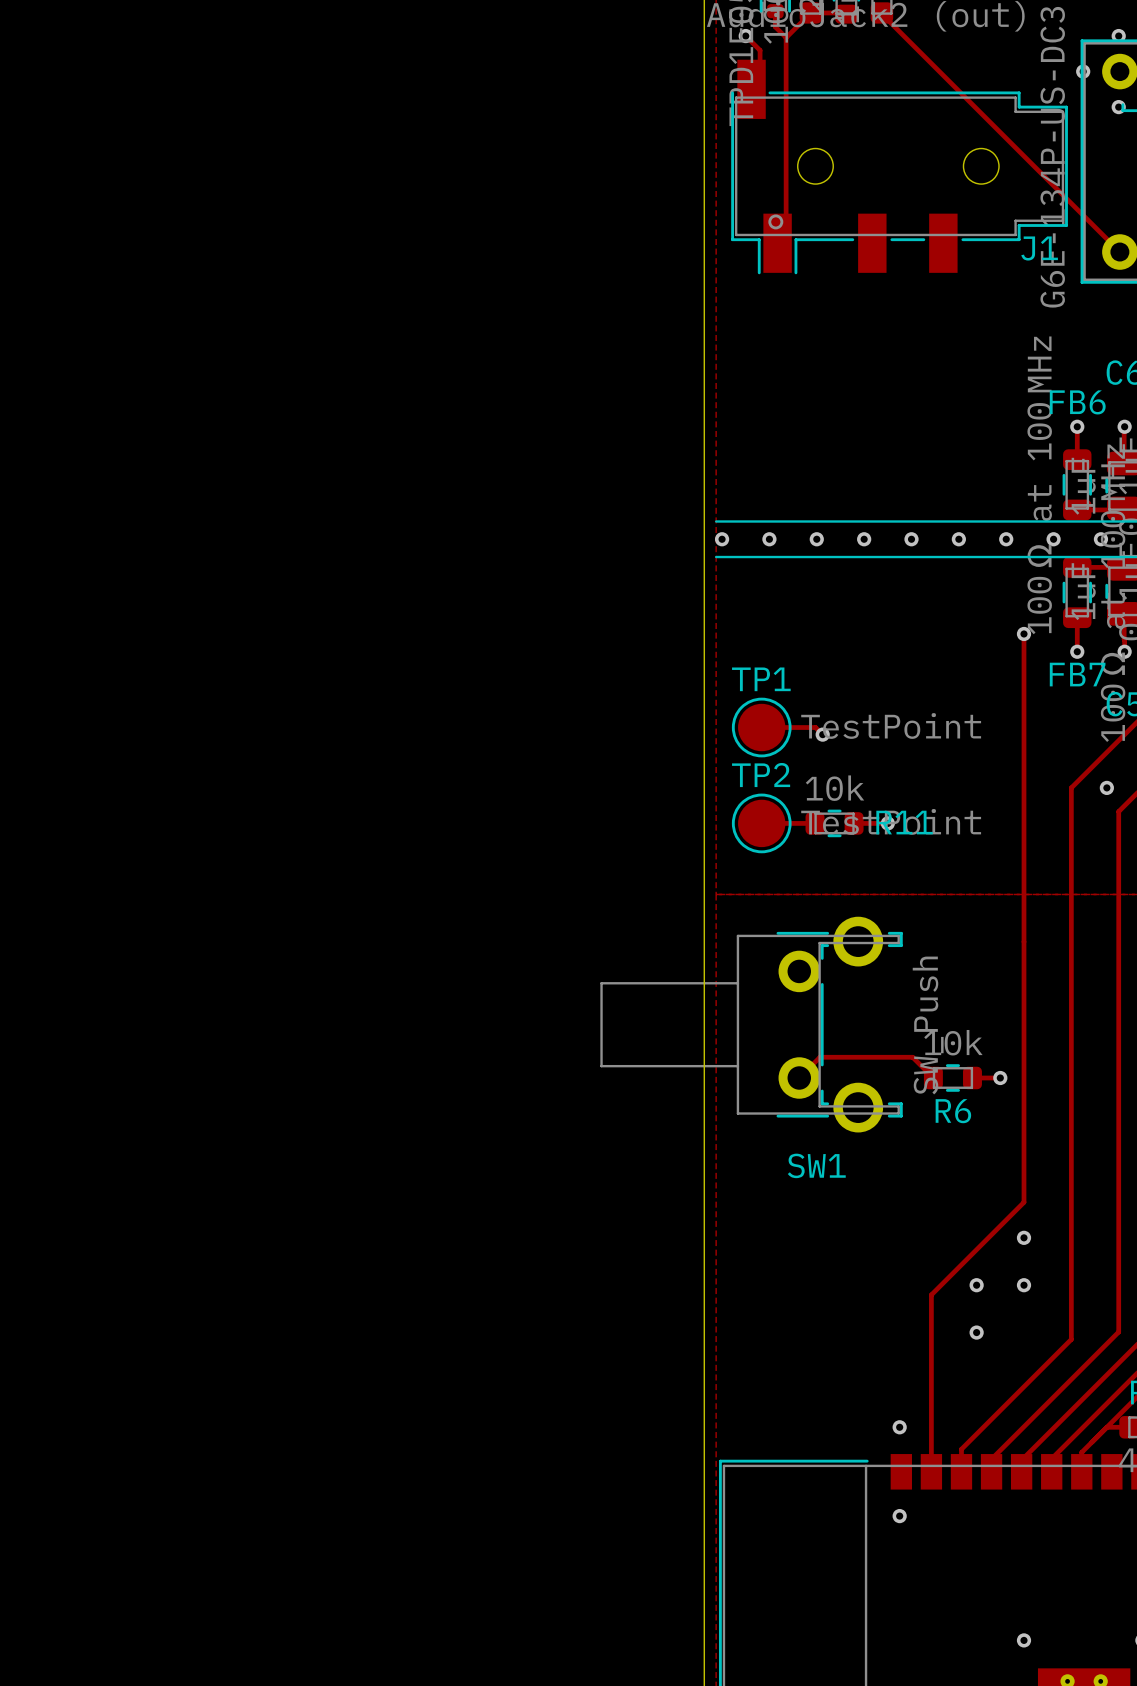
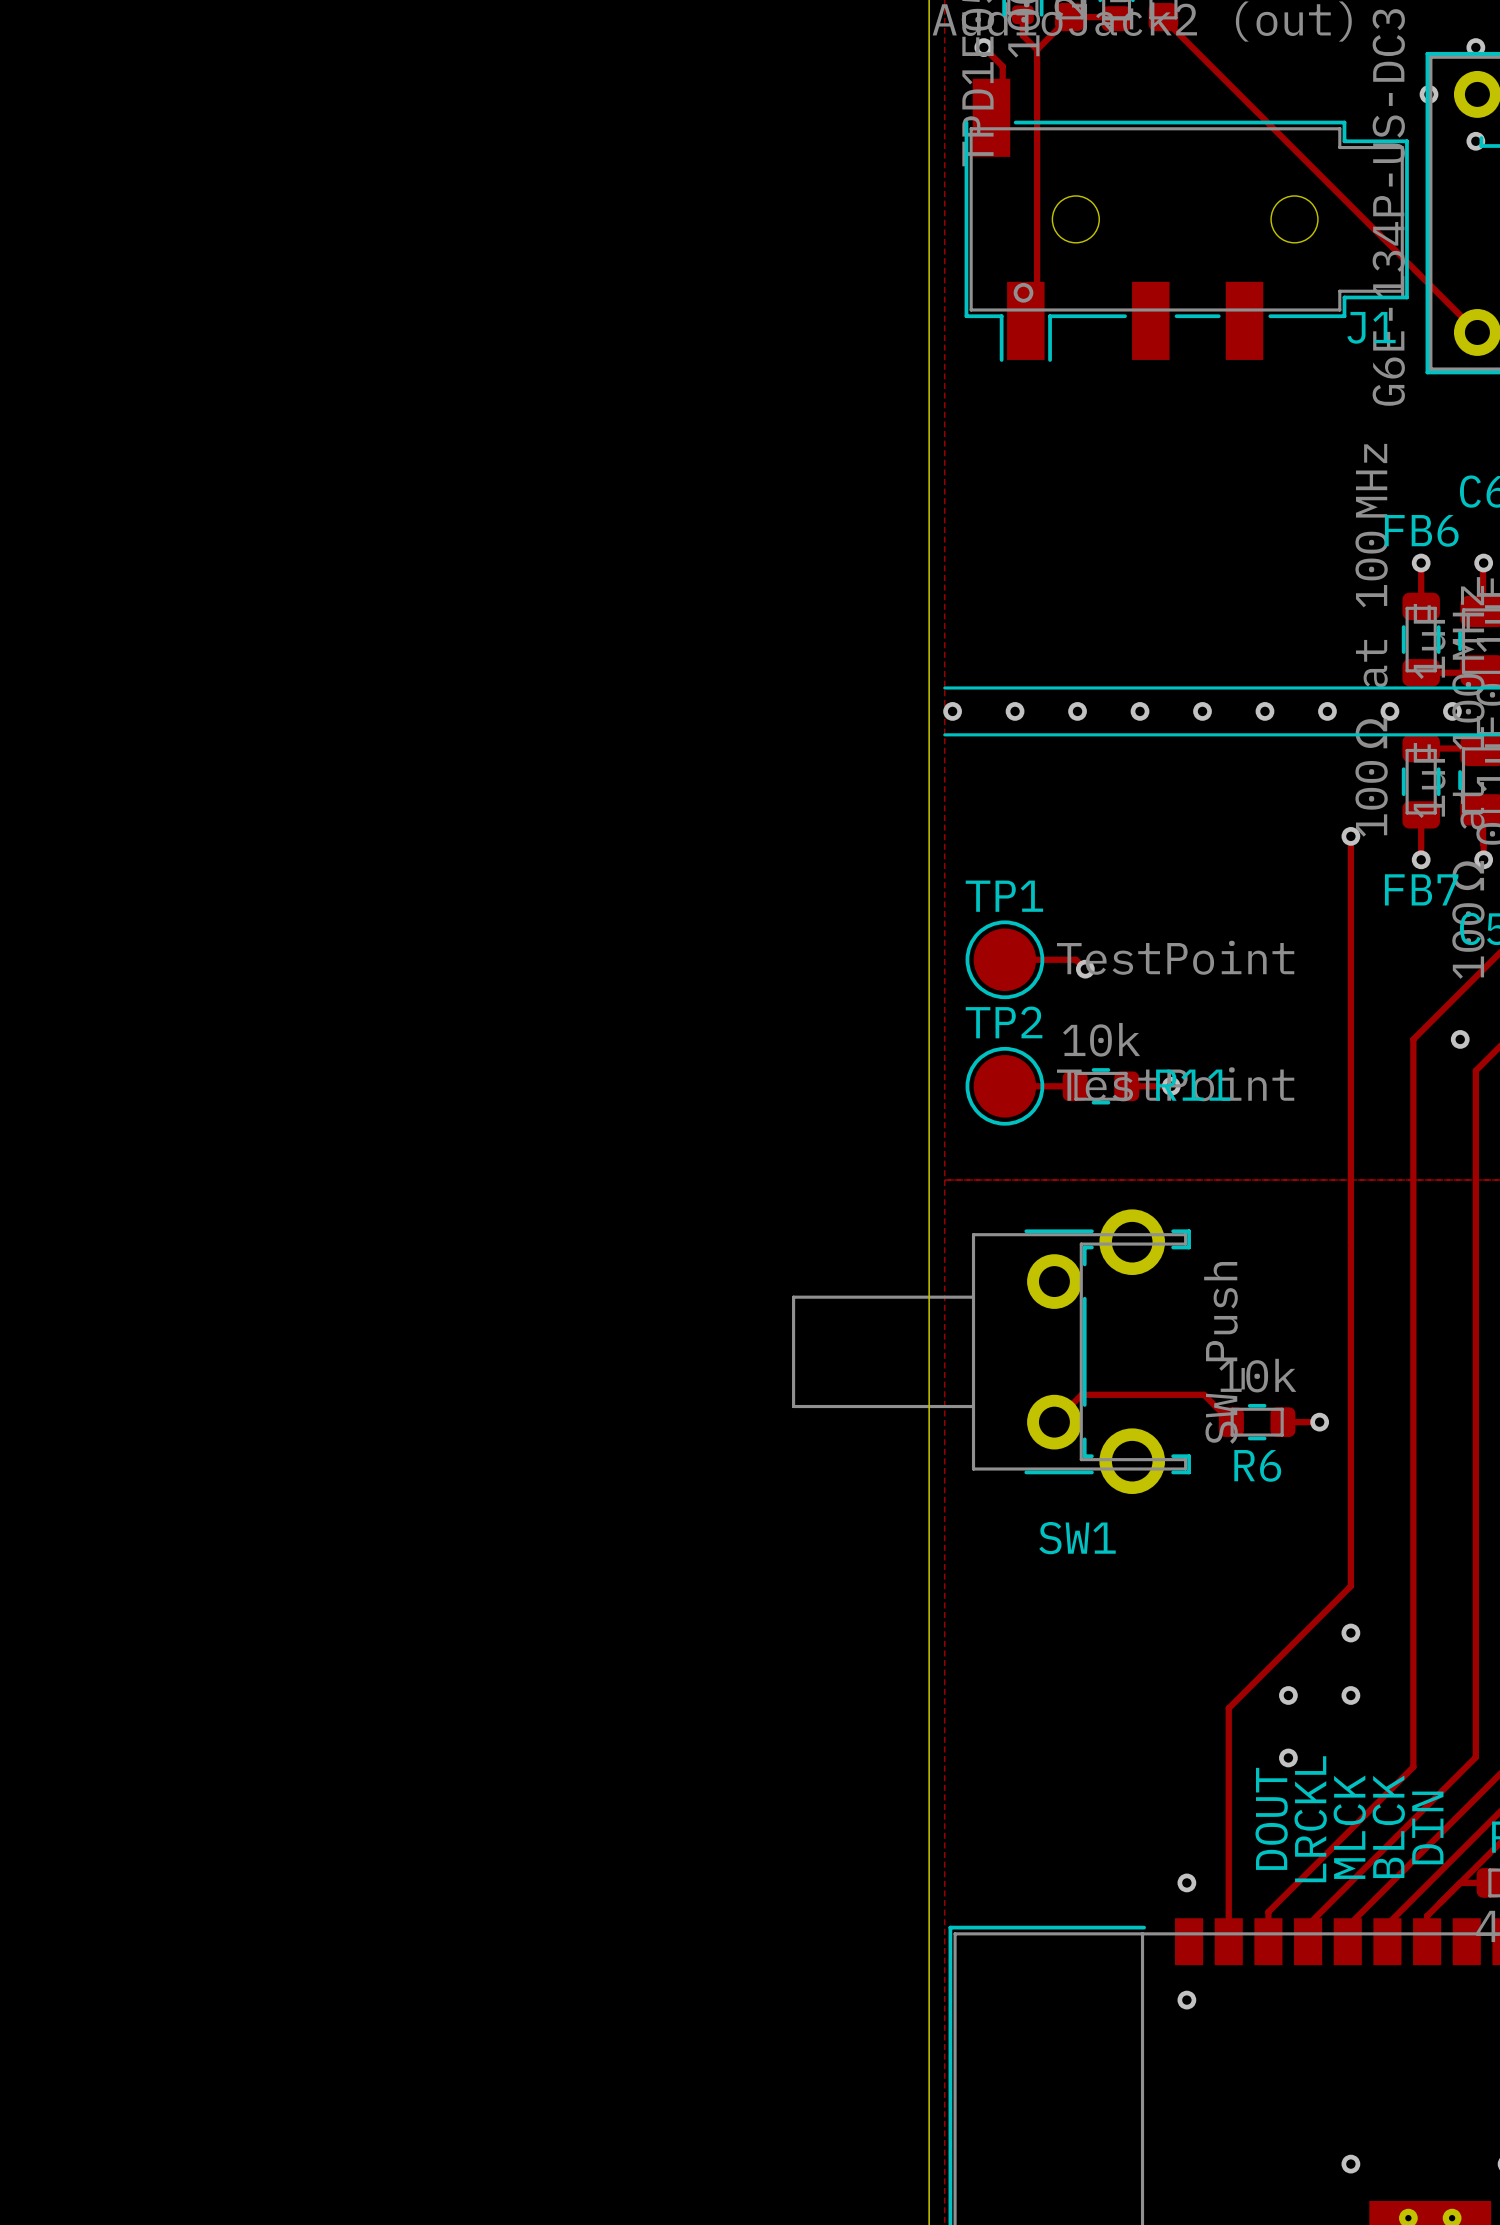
text: none -> DOUT (1271, 1818)
text: none -> LRCKL (1310, 1819)
text: none -> BLCK (1388, 1826)
text: none -> MLCK (1349, 1827)
text: none -> DIN (1427, 1827)

